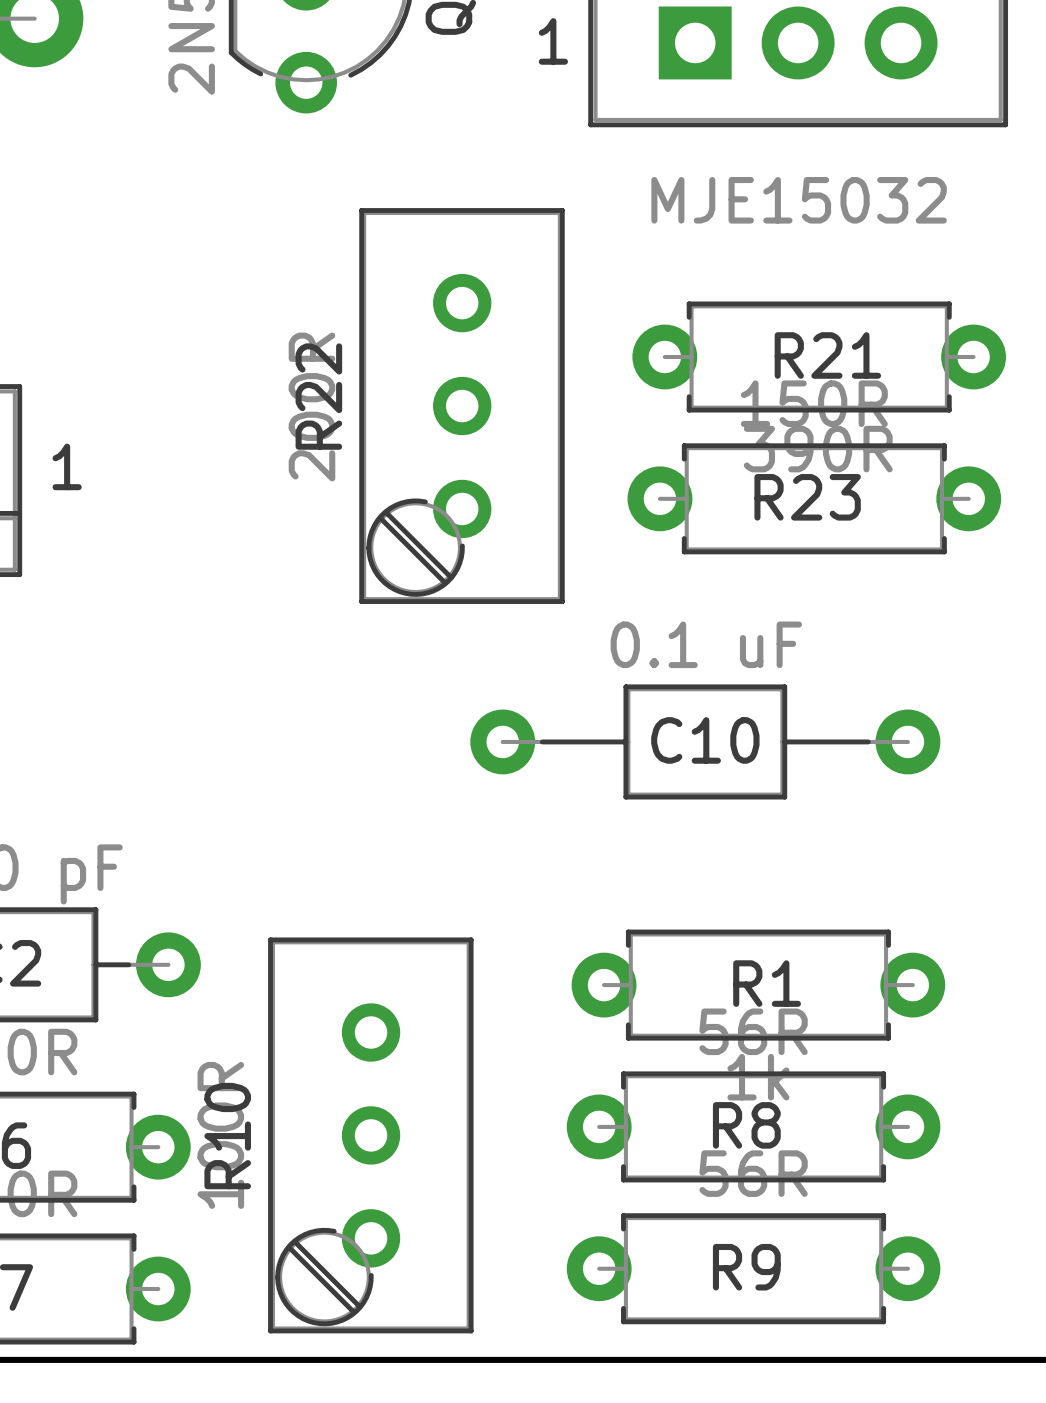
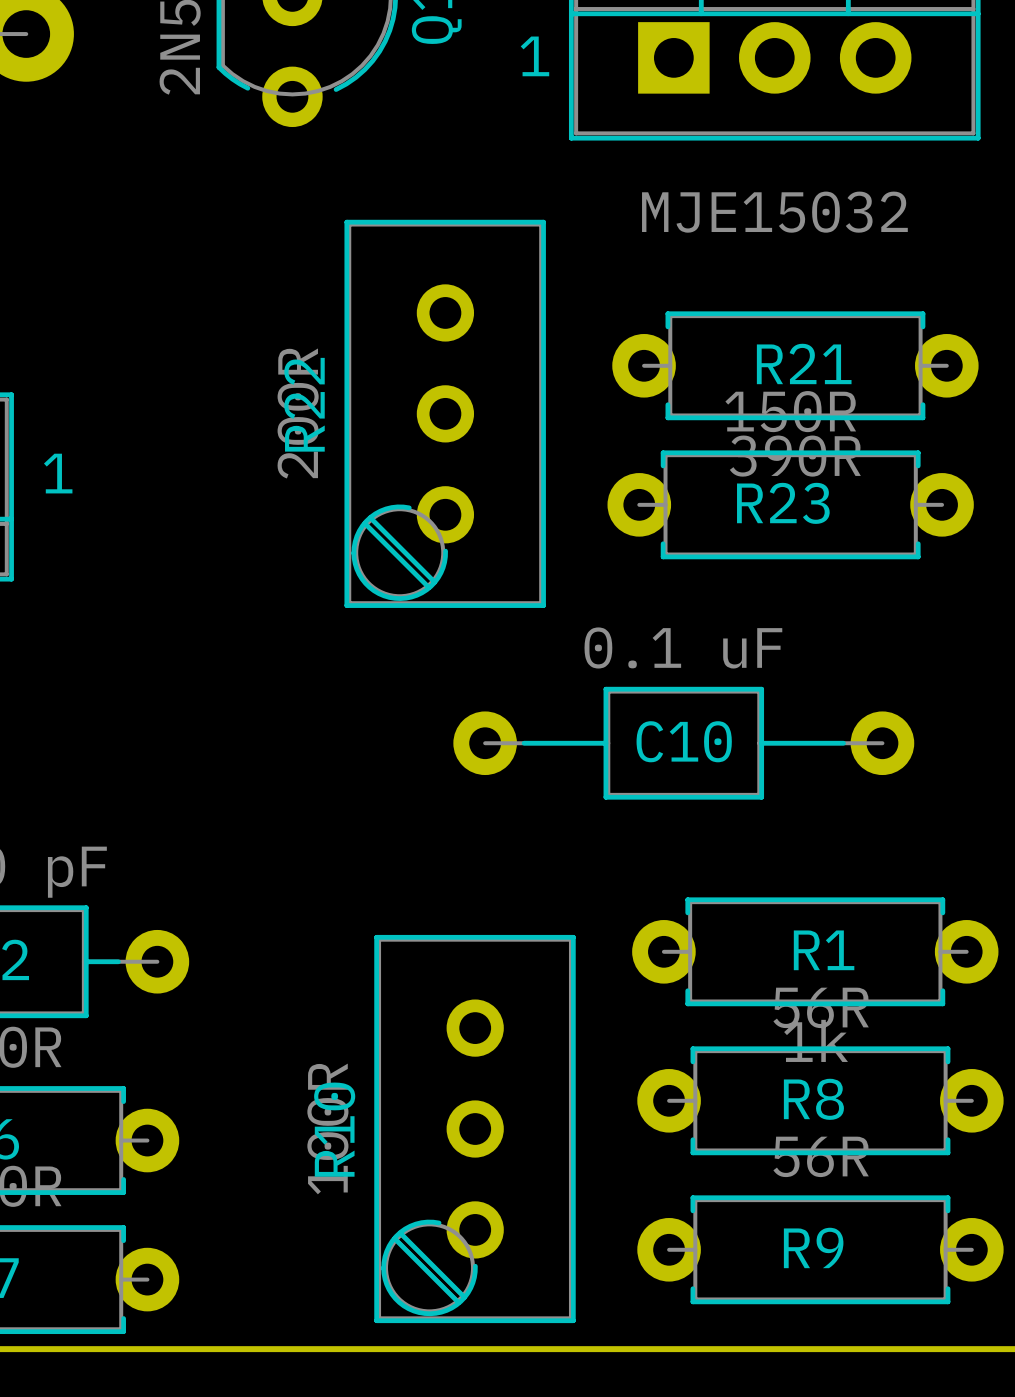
R1 position: (758, 985) -> (815, 951)
R8 position: (753, 1126) -> (820, 1100)
R10 position: (370, 1135) -> (474, 1129)
R9 position: (753, 1268) -> (820, 1249)

